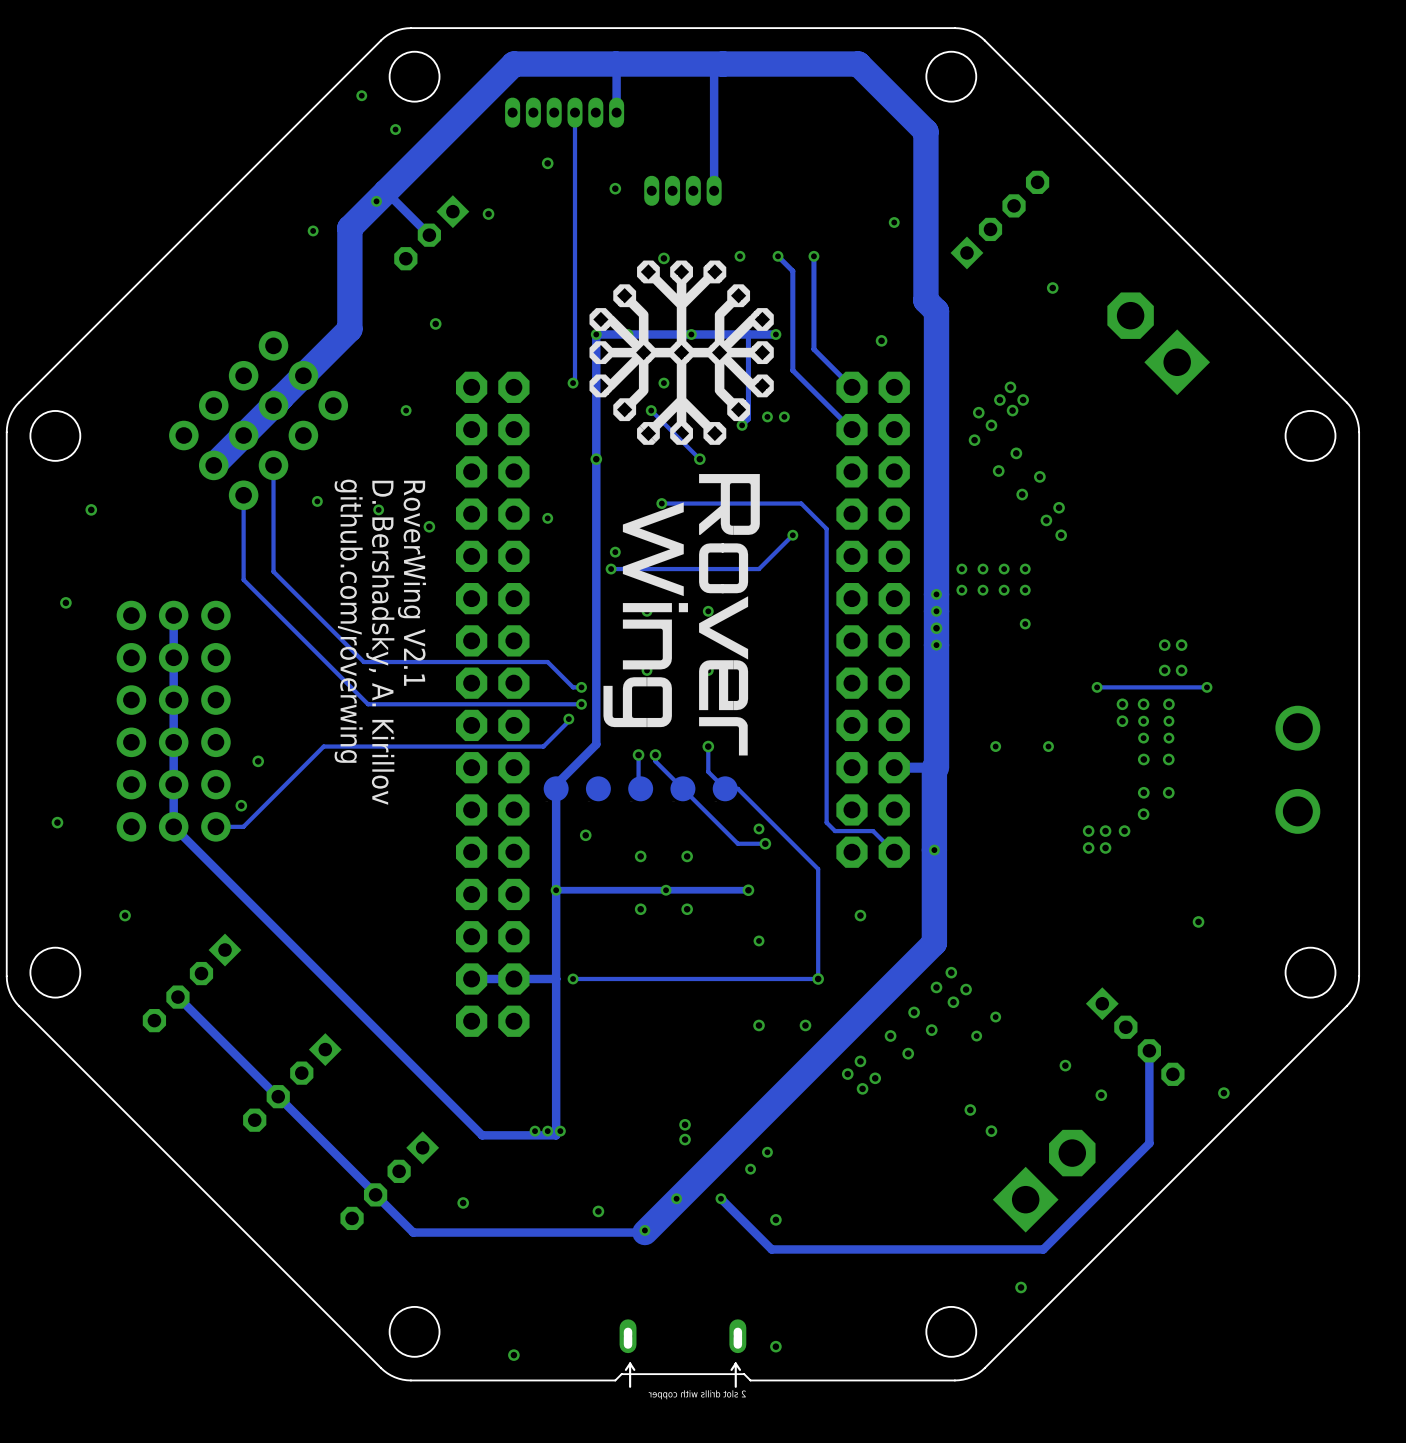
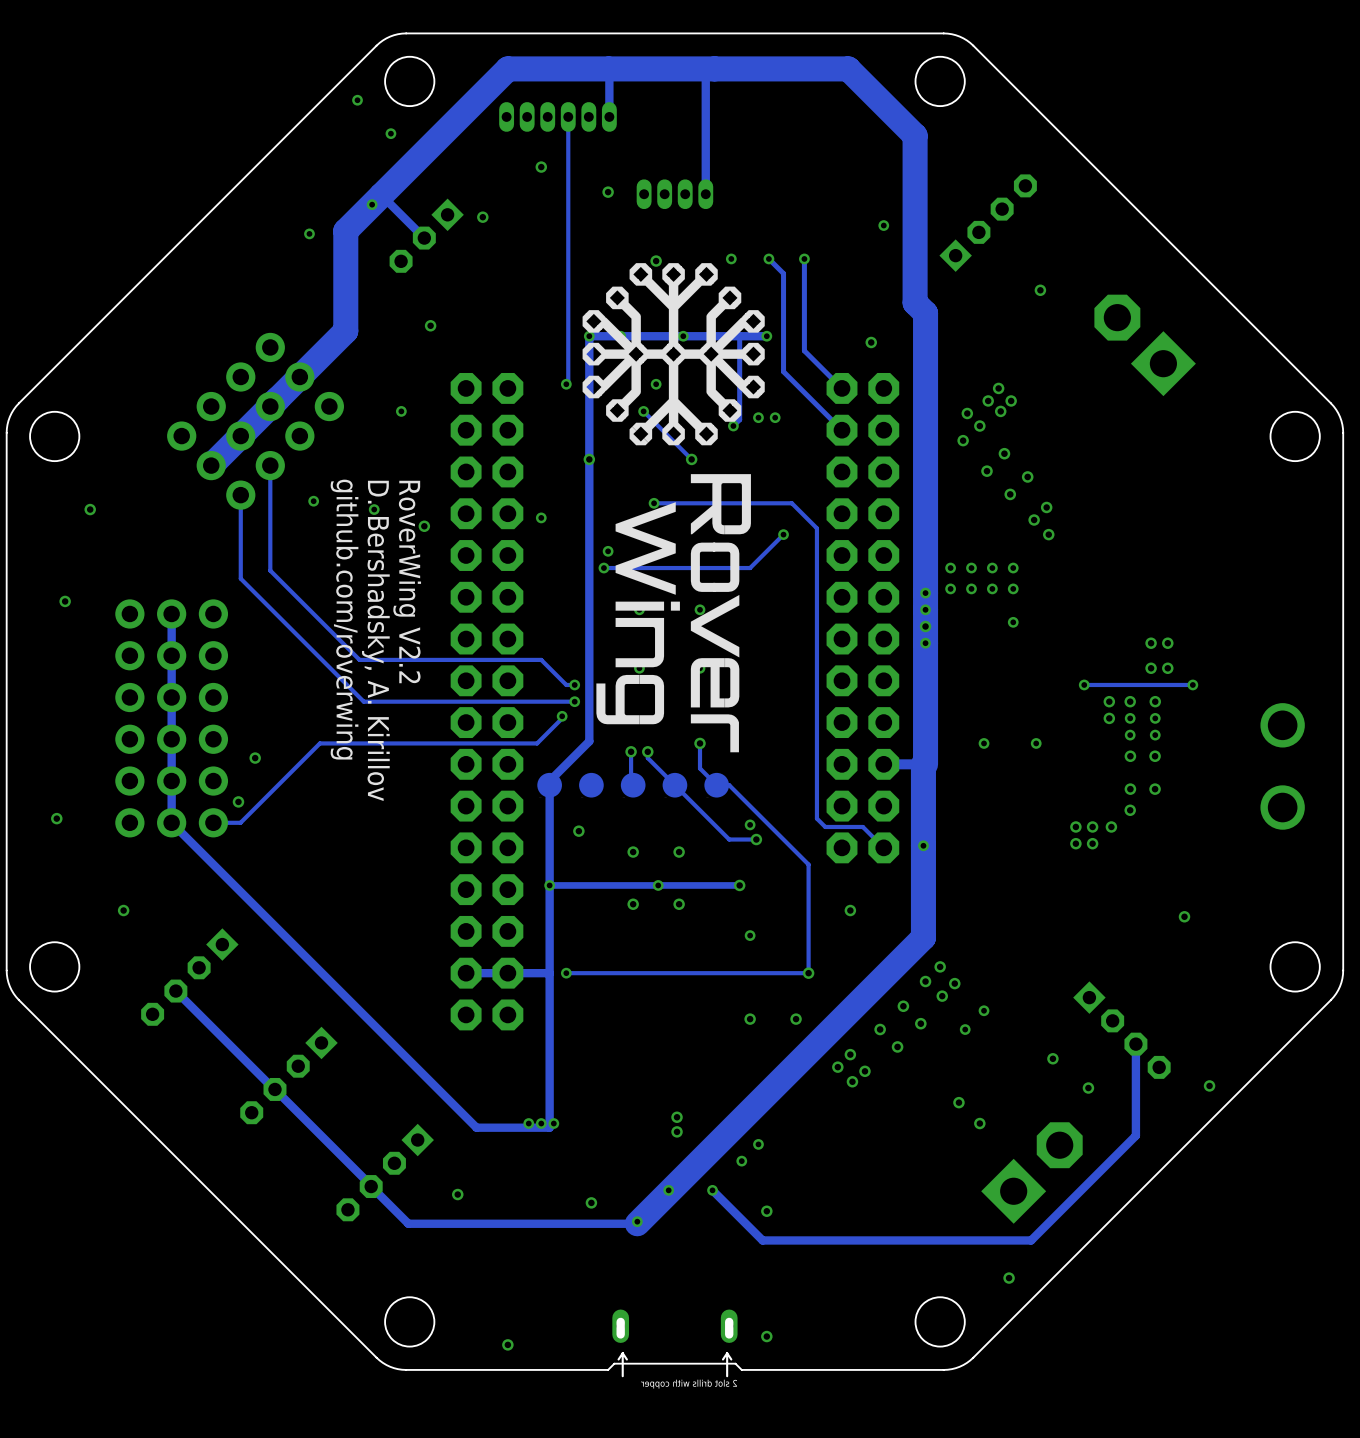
text: RoverWing V2.1 (412, 583) -> RoverWing V2.2 (407, 582)

